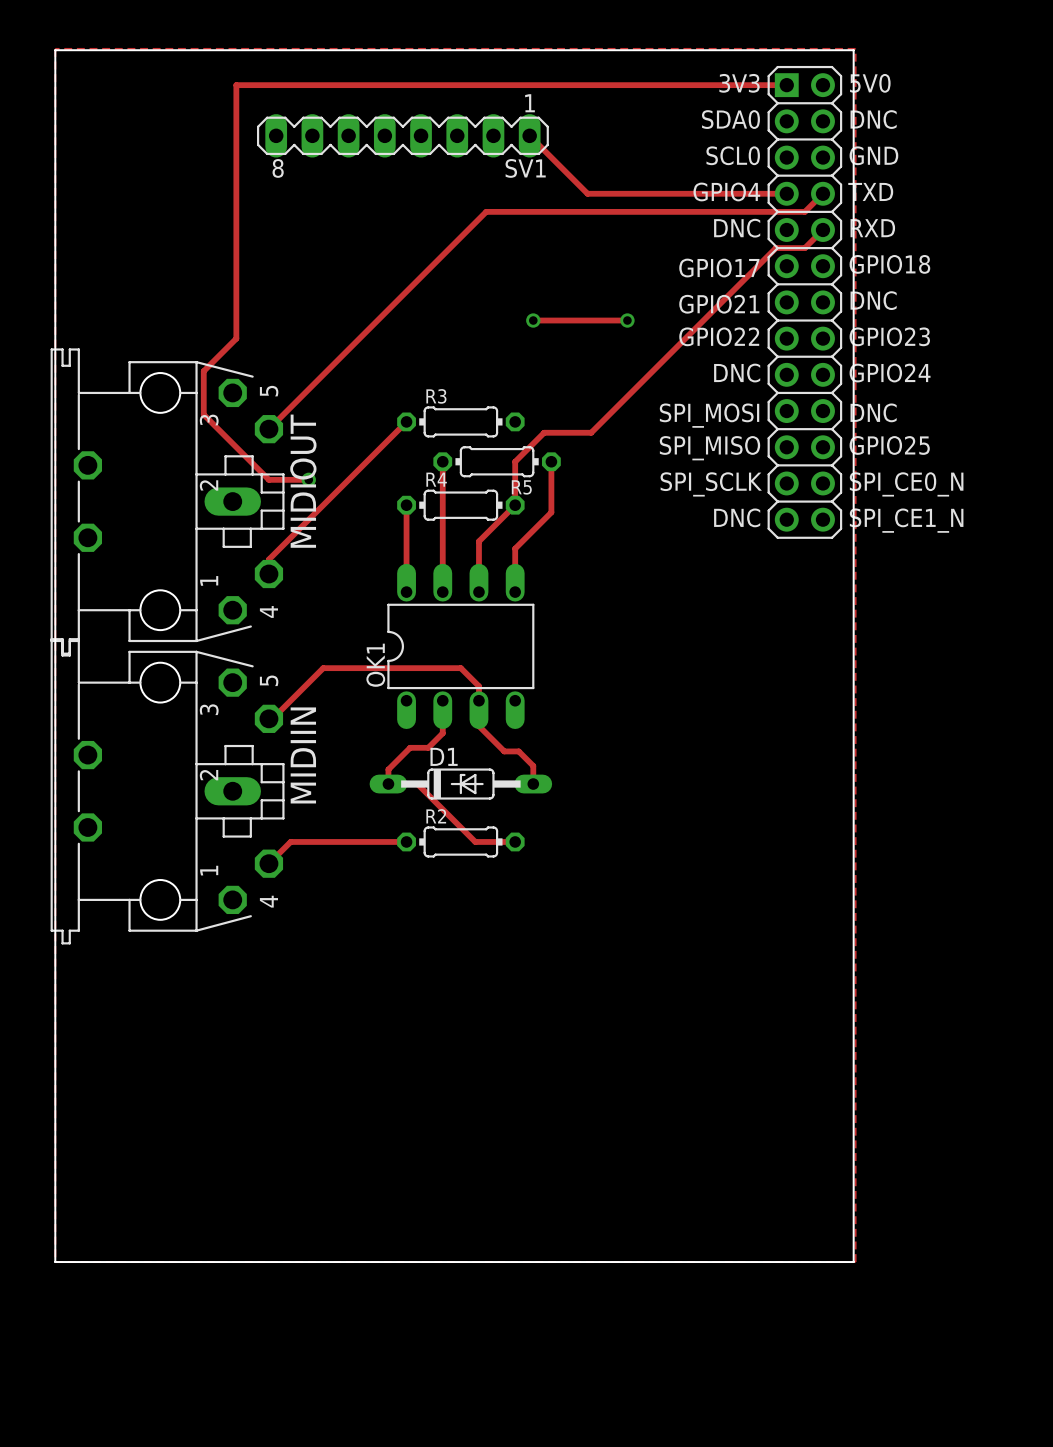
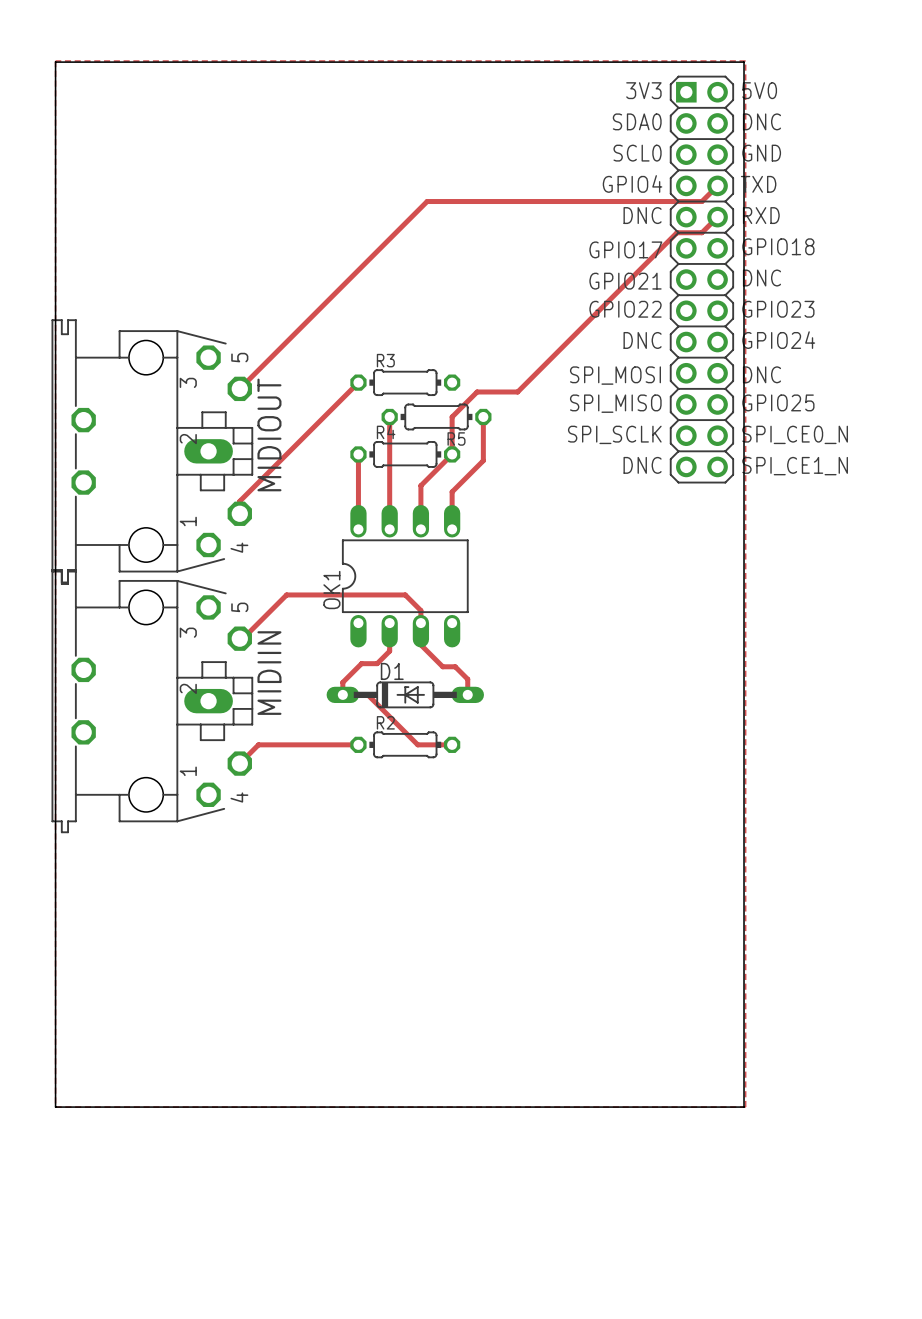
track: (786, 85) (236, 85) (236, 338) (203, 371) (203, 414) (268, 479) (308, 479) -> none
SV1: (402, 135) -> none
track: (529, 135) (587, 193) (783, 193) -> none
track: (533, 320) (627, 320) -> none
via: (533, 320) -> none
via: (627, 320) -> none
via: (308, 479) -> none

